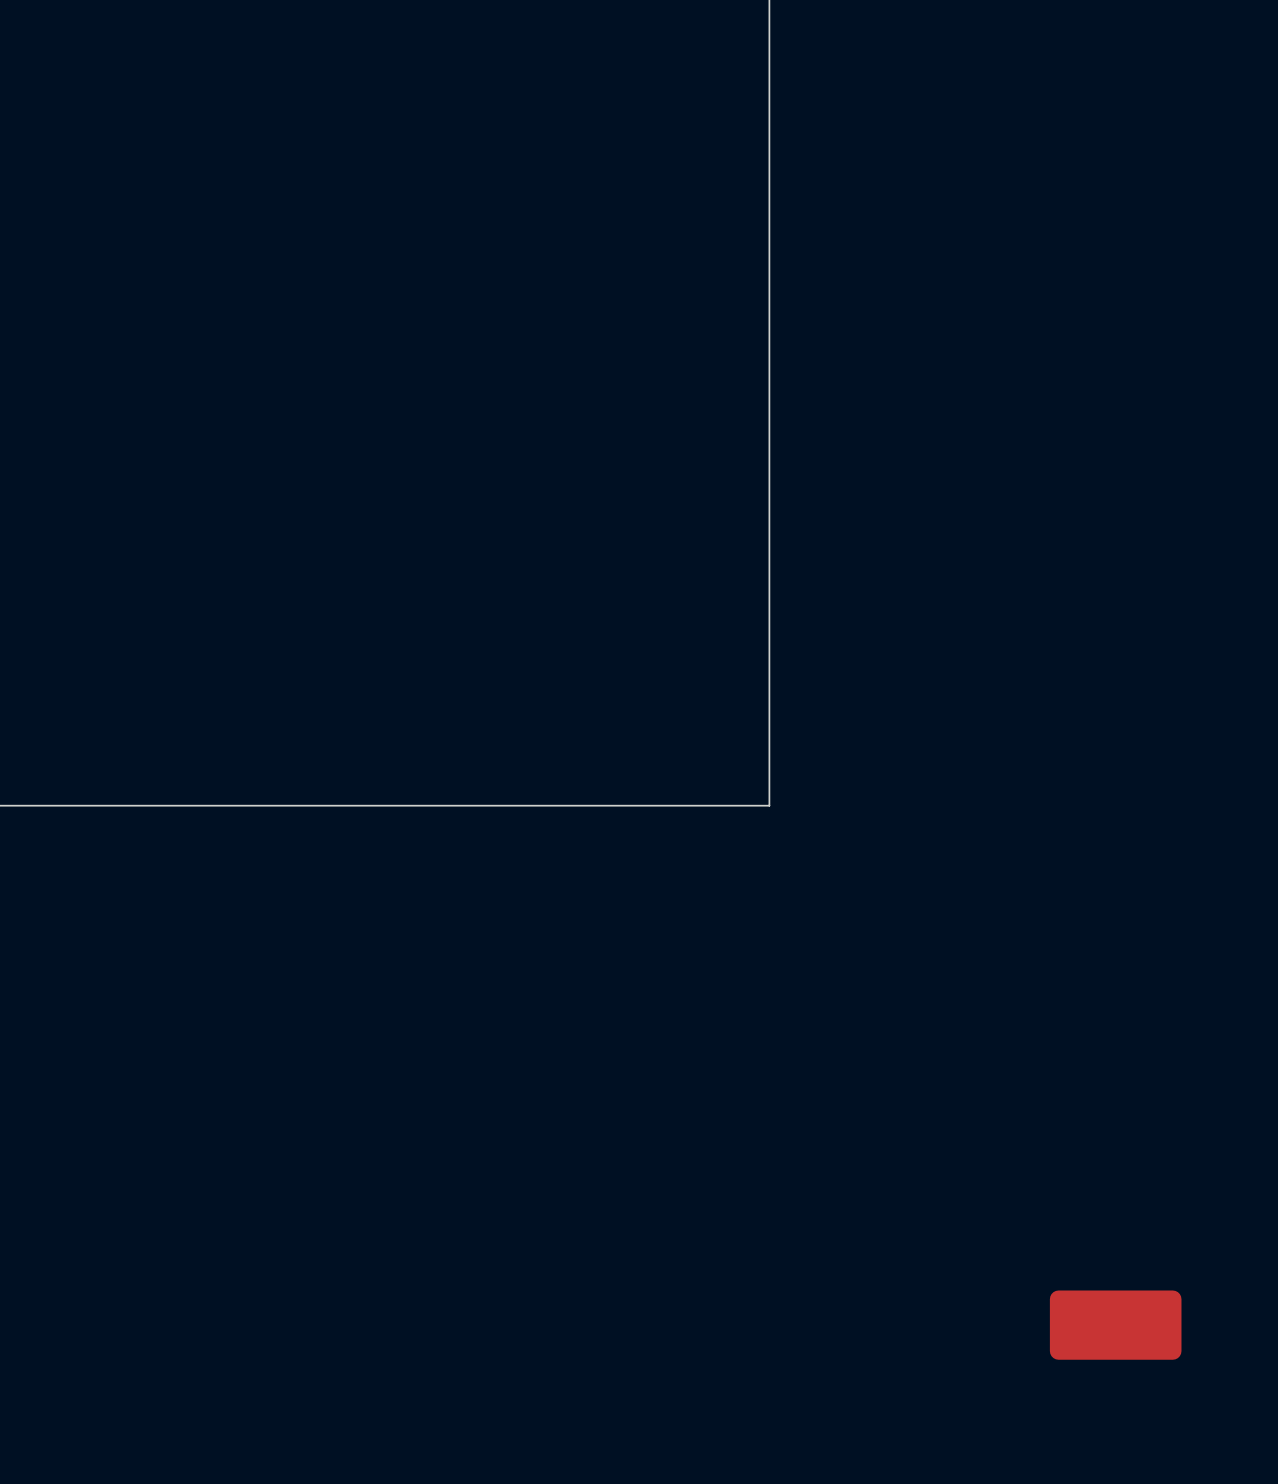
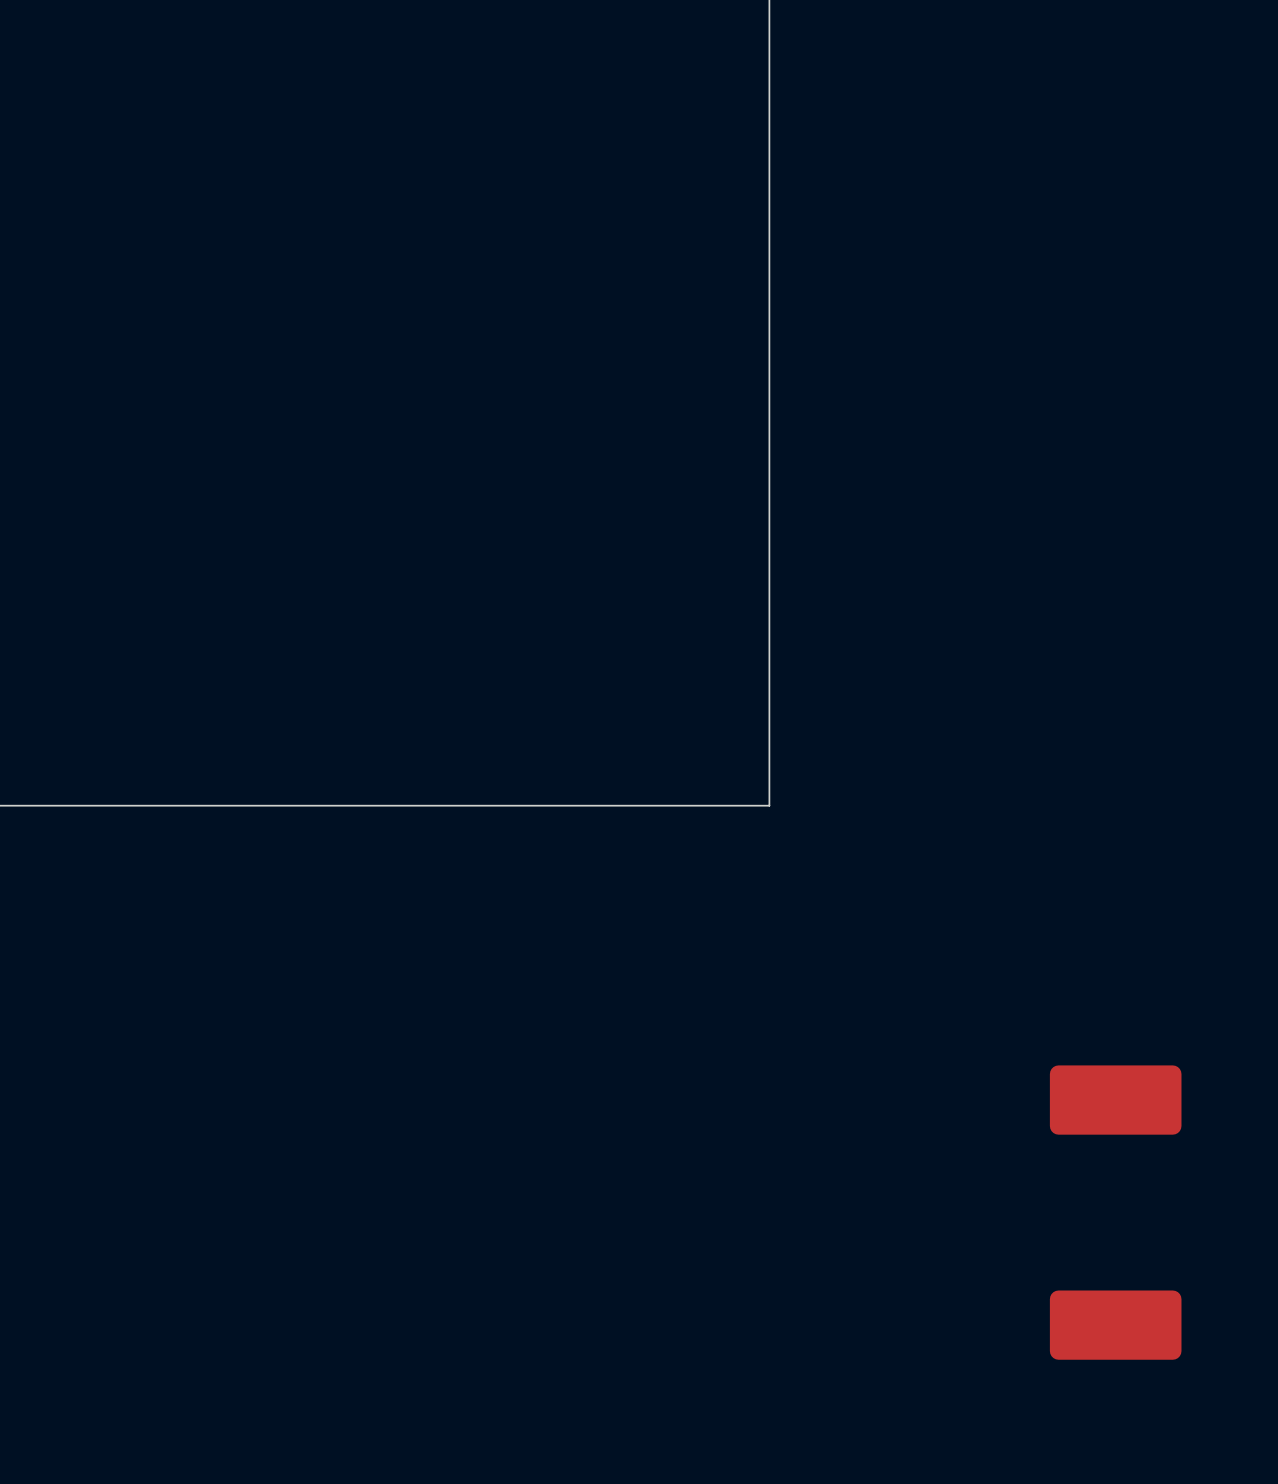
part: none -> (1115, 1100)

